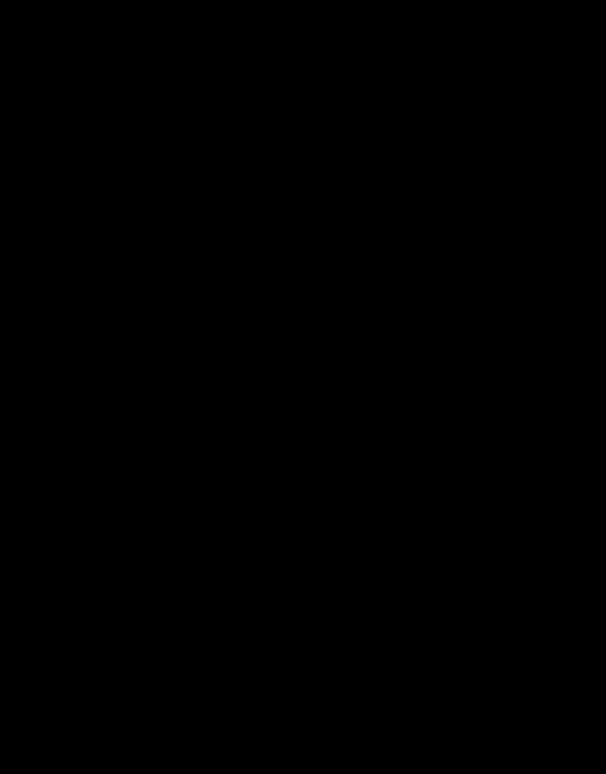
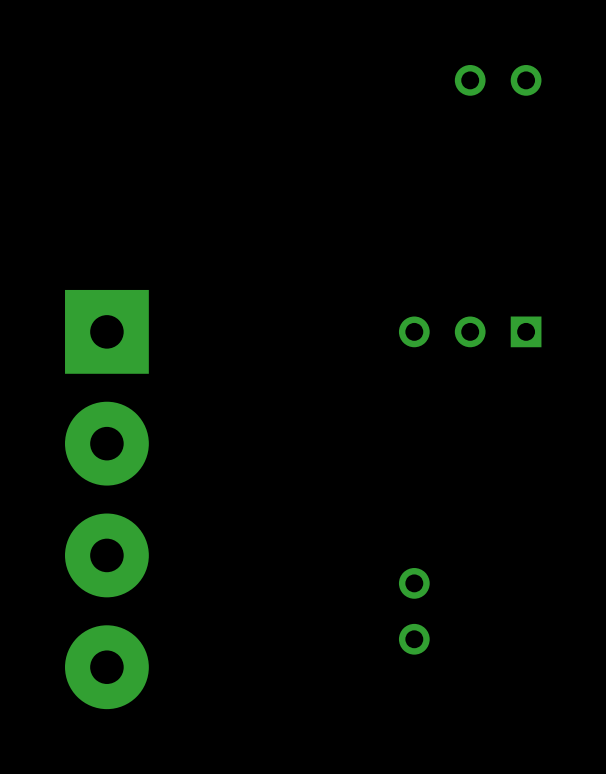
part: none -> (498, 80)
part: none -> (470, 331)
part: none -> (106, 499)
part: none -> (414, 611)

